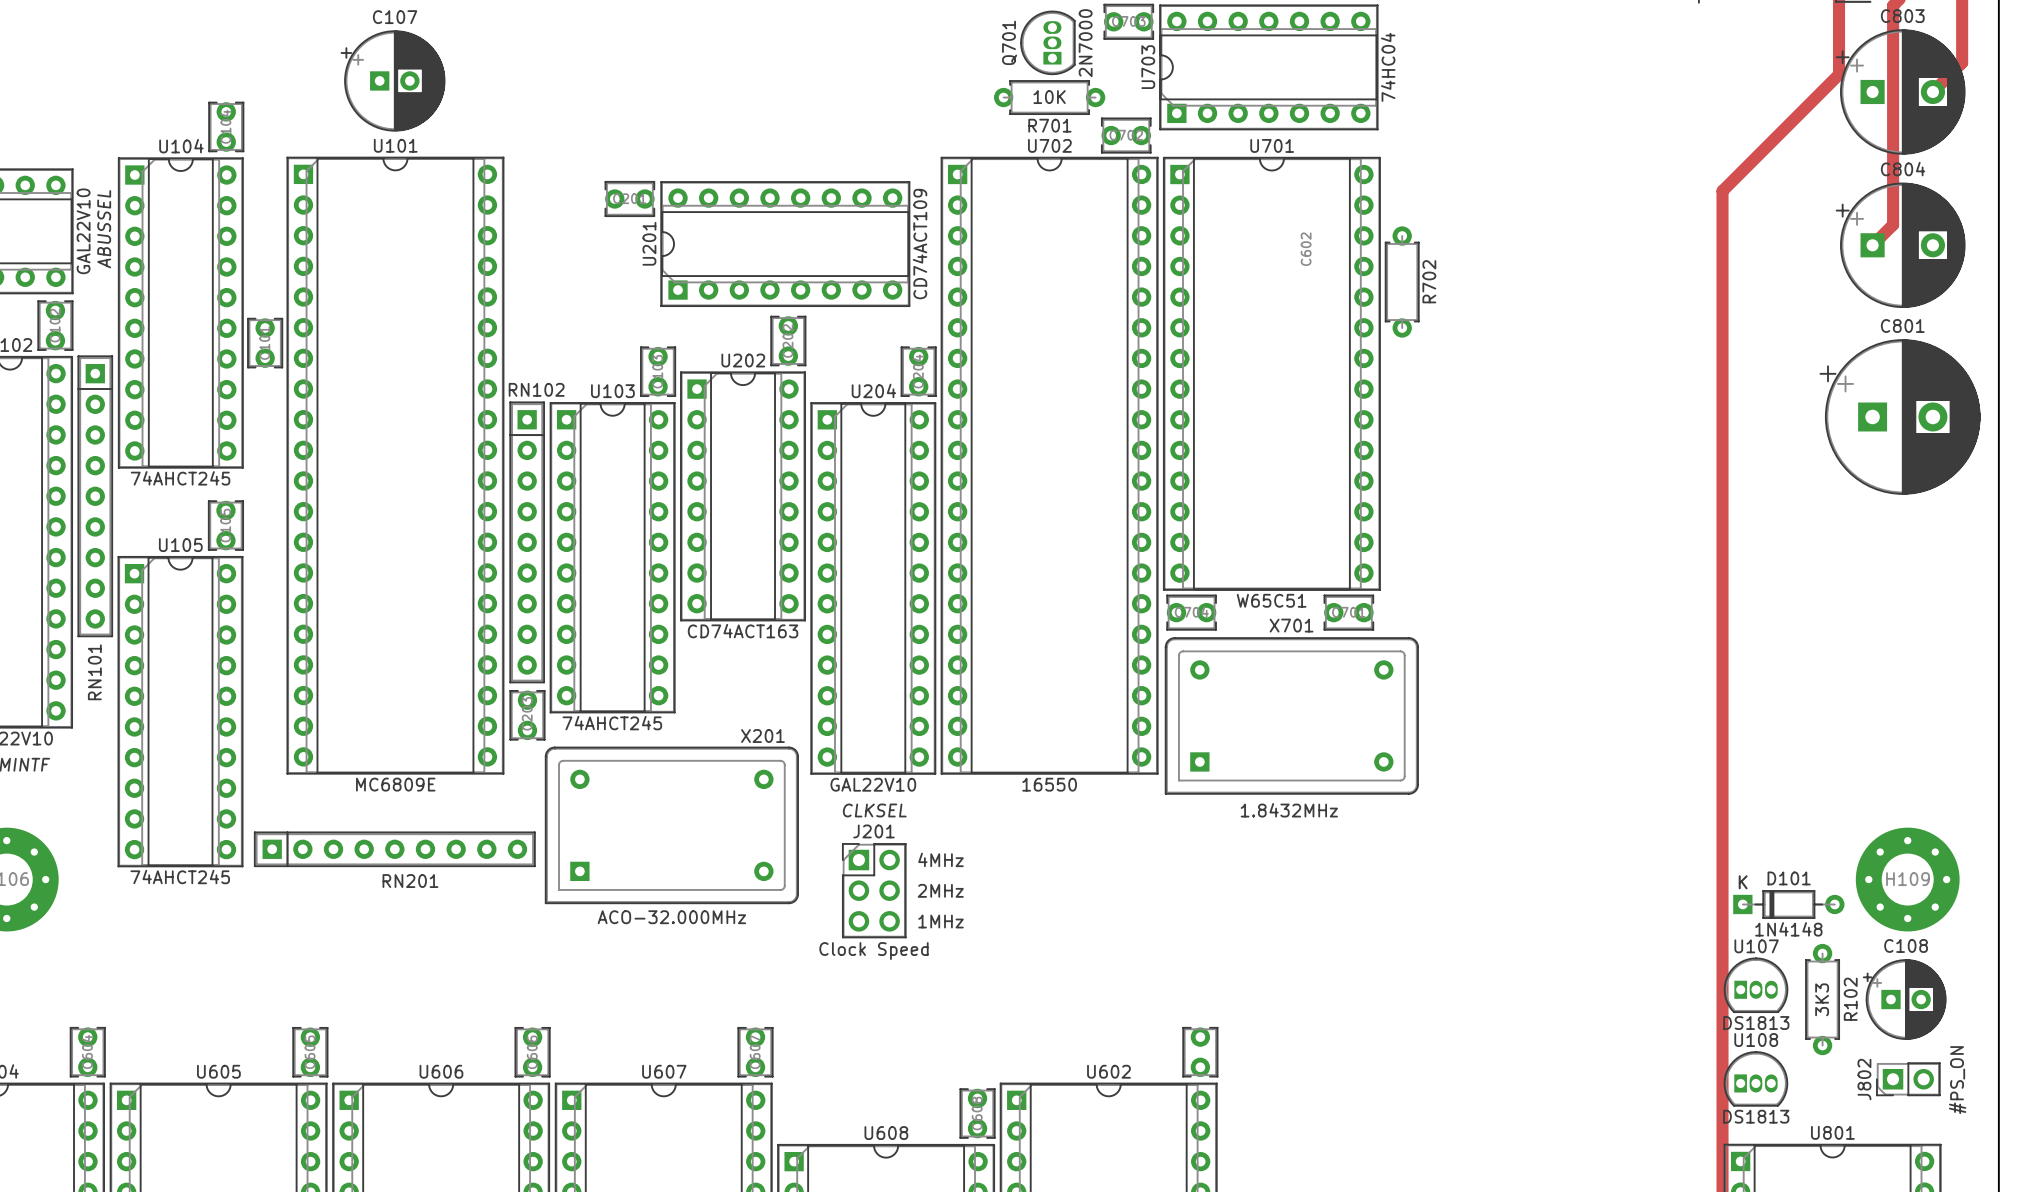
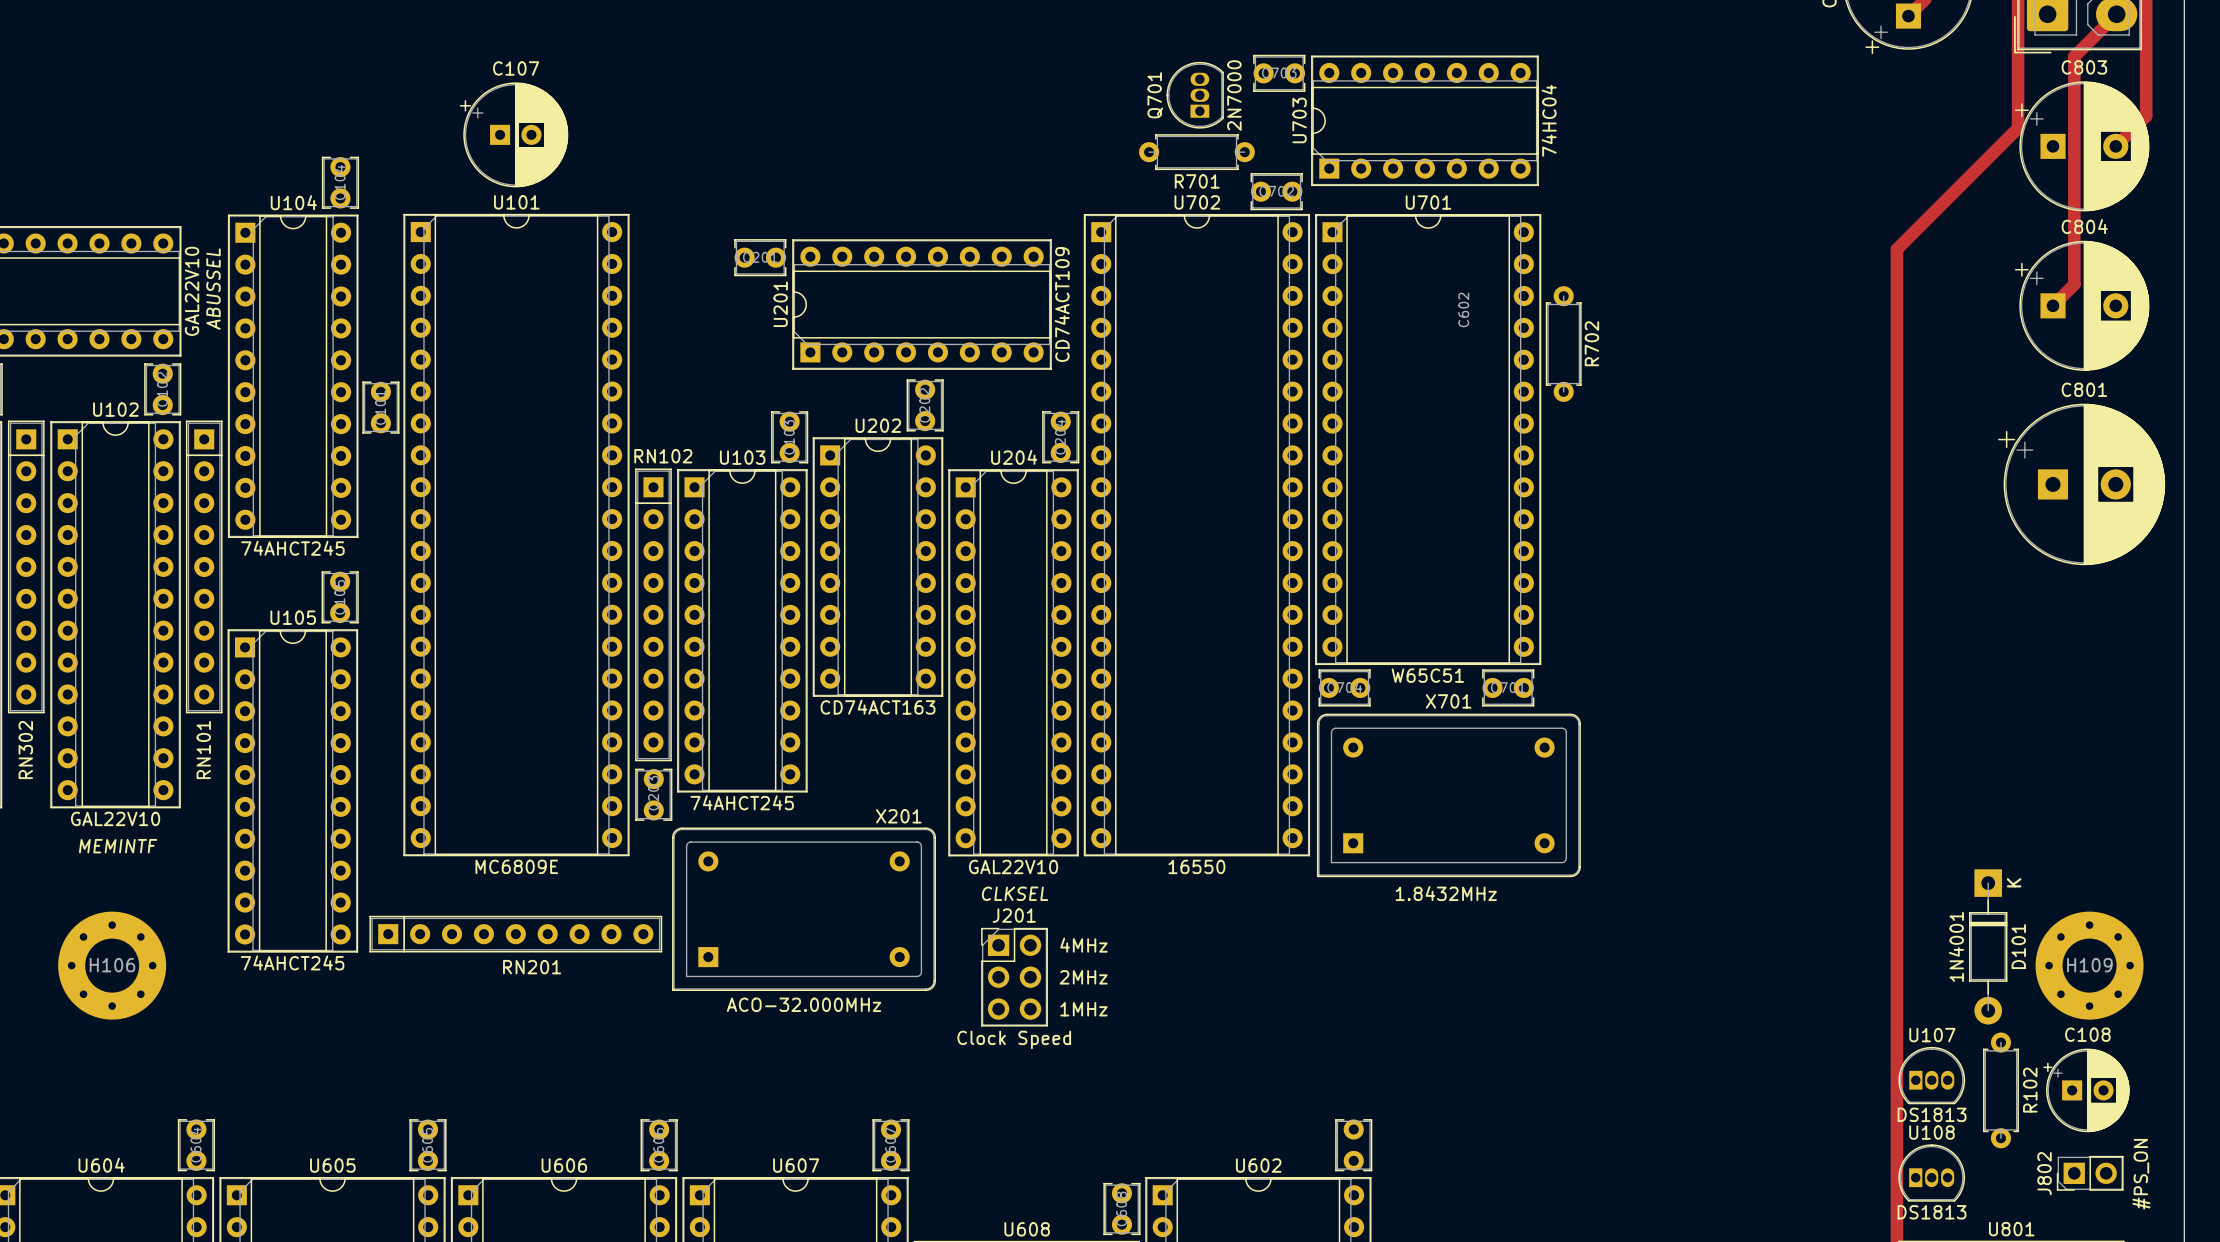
R701 value: 10K (1049, 97) -> none
D101 name position: D101 (1789, 878) -> D101 (2018, 946)
D101 footprint: [1733, 890, 1845, 919] -> [1969, 869, 2008, 1025]
D101 value: 1N4148 (1788, 929) -> 1N4001 (1956, 946)
R102 value: 3K3 (1822, 999) -> none

